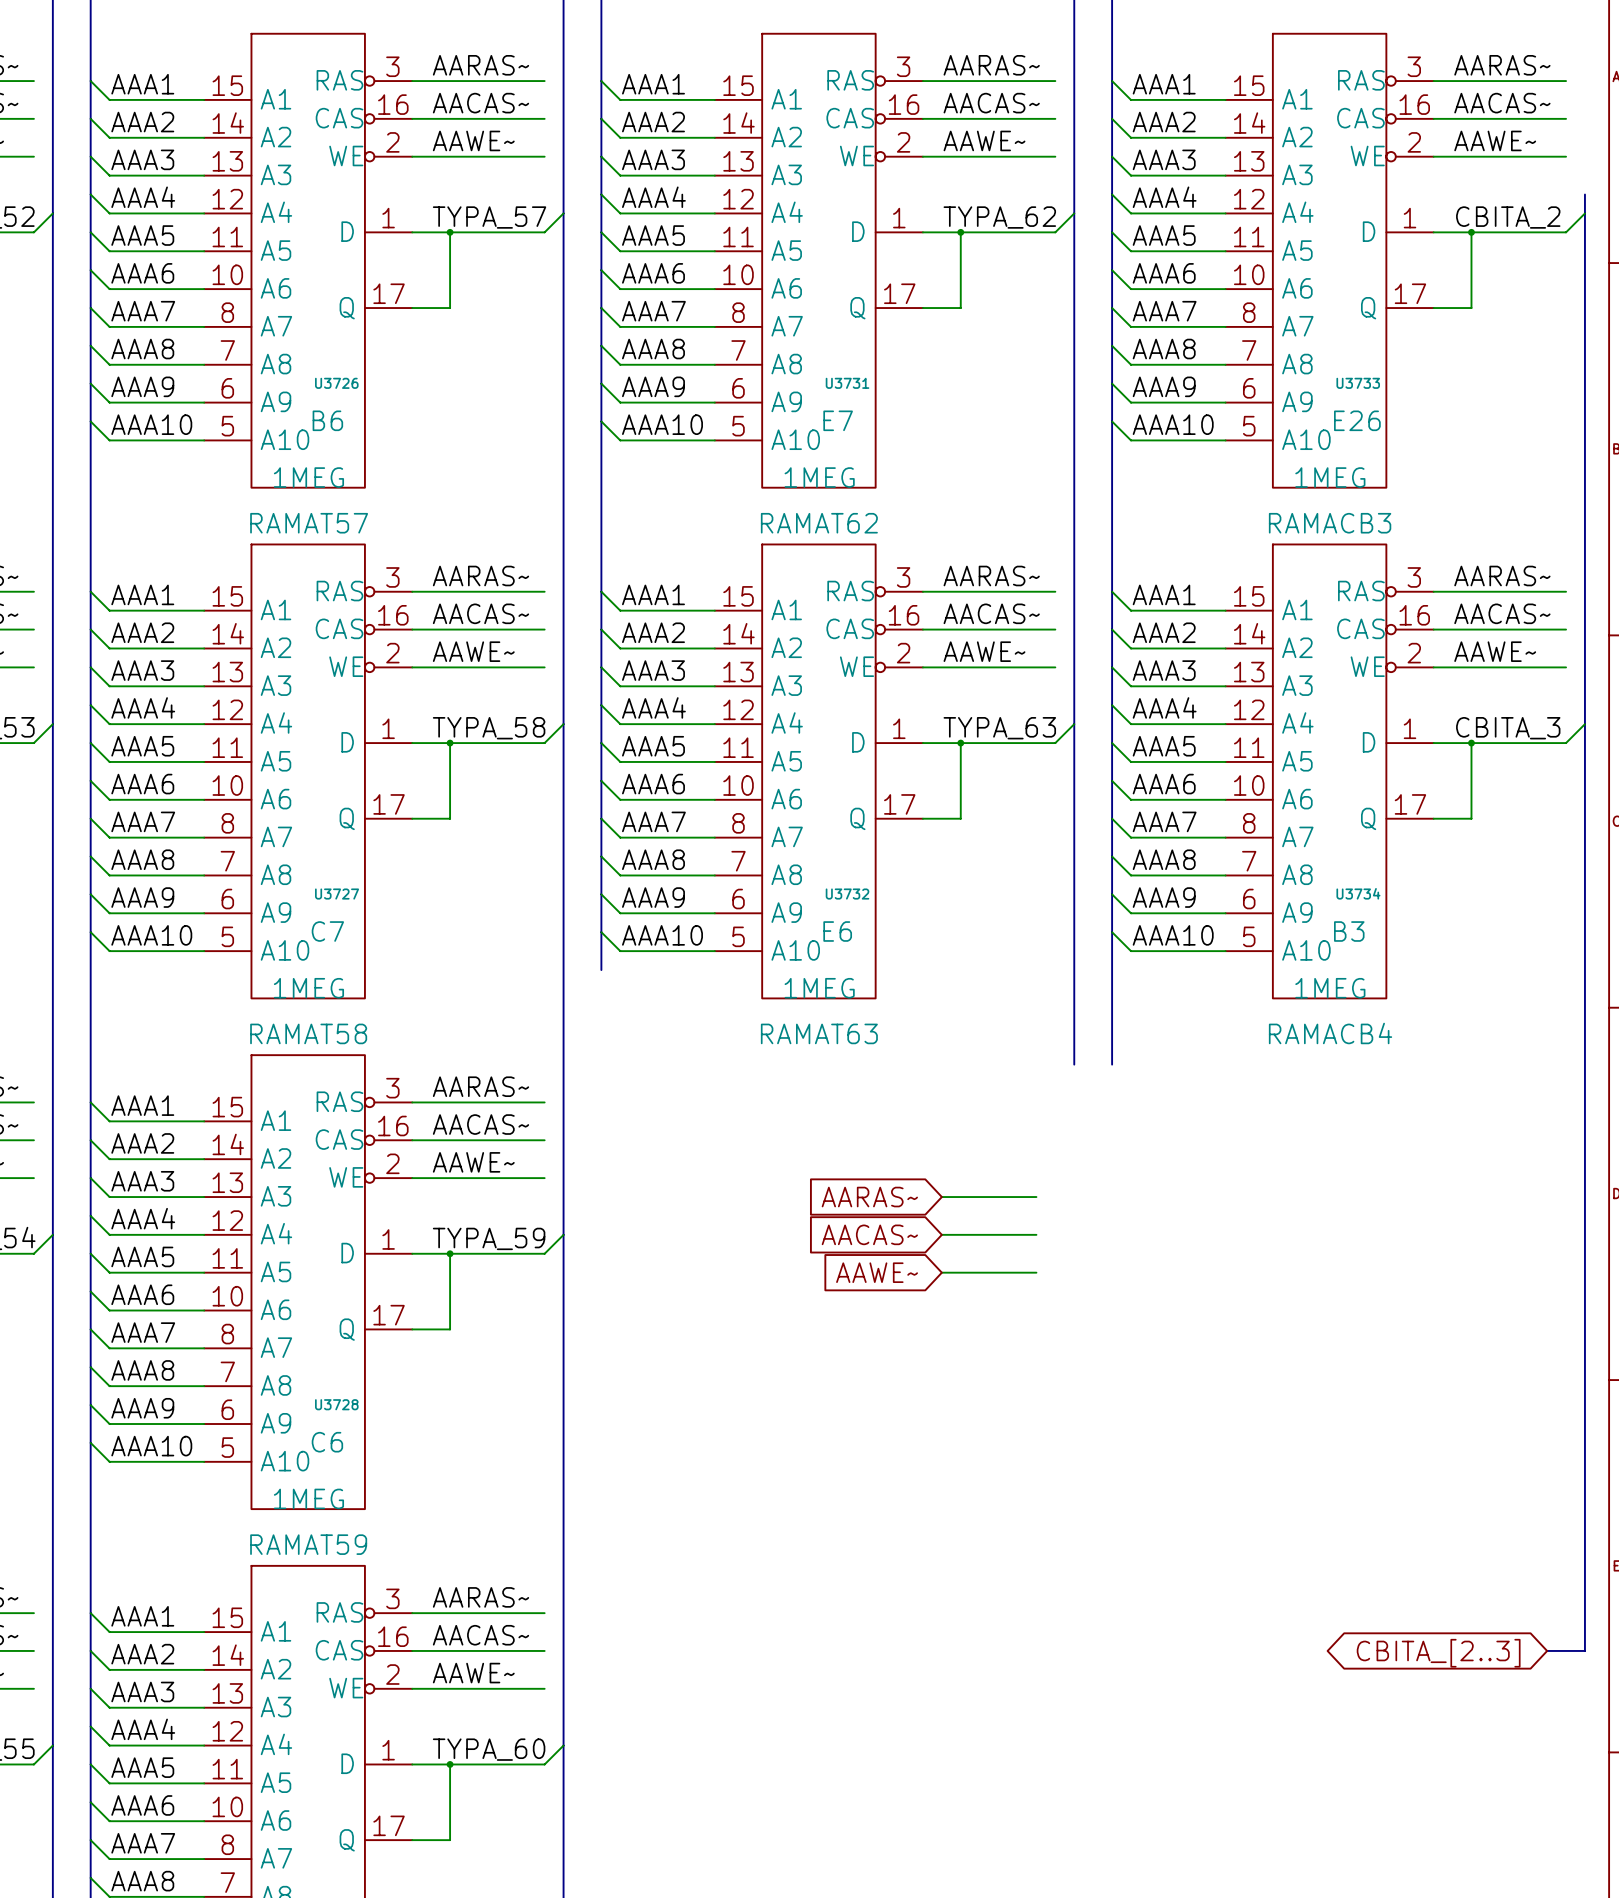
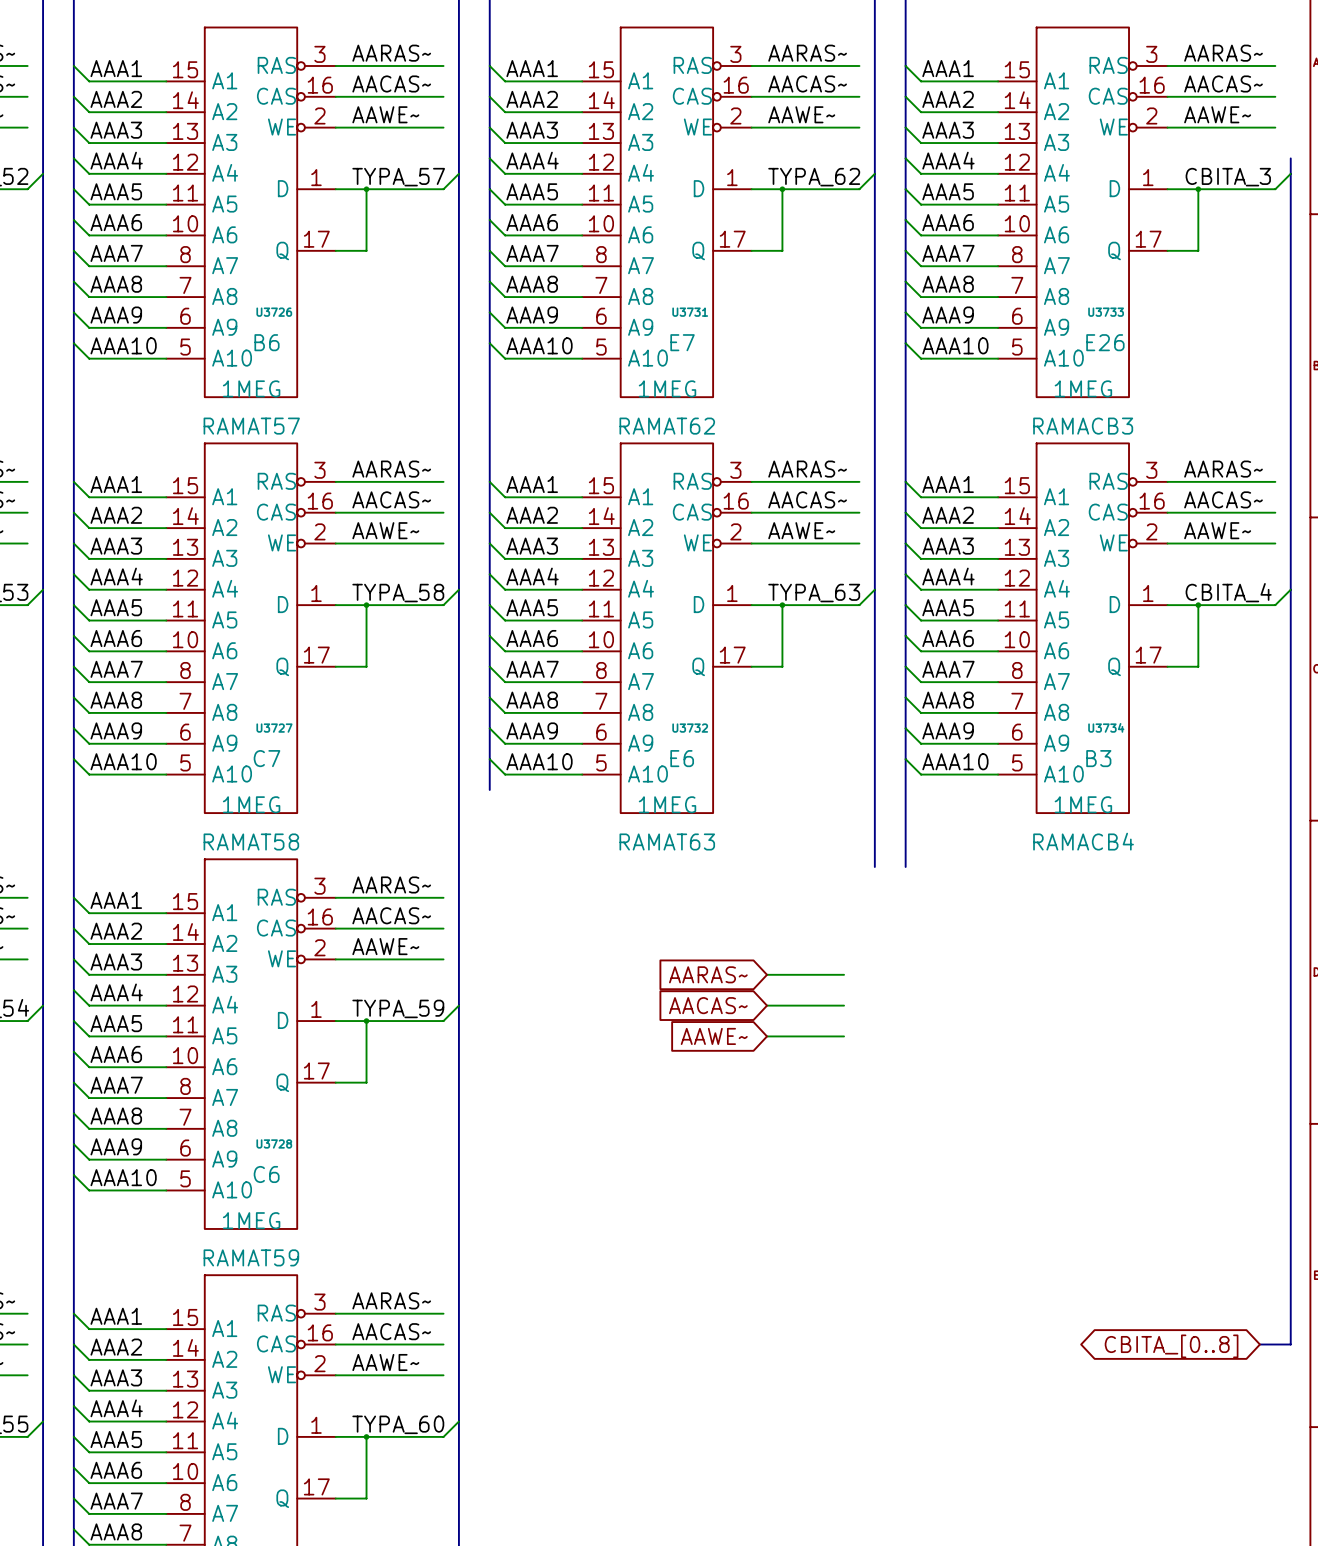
label: CBITA_2 (1508, 217) -> CBITA_3 (1228, 177)
label: CBITA_3 (1508, 728) -> CBITA_4 (1228, 592)
global label: CBITA_[2..3] (1438, 1653) -> CBITA_[0..8] (1171, 1346)

